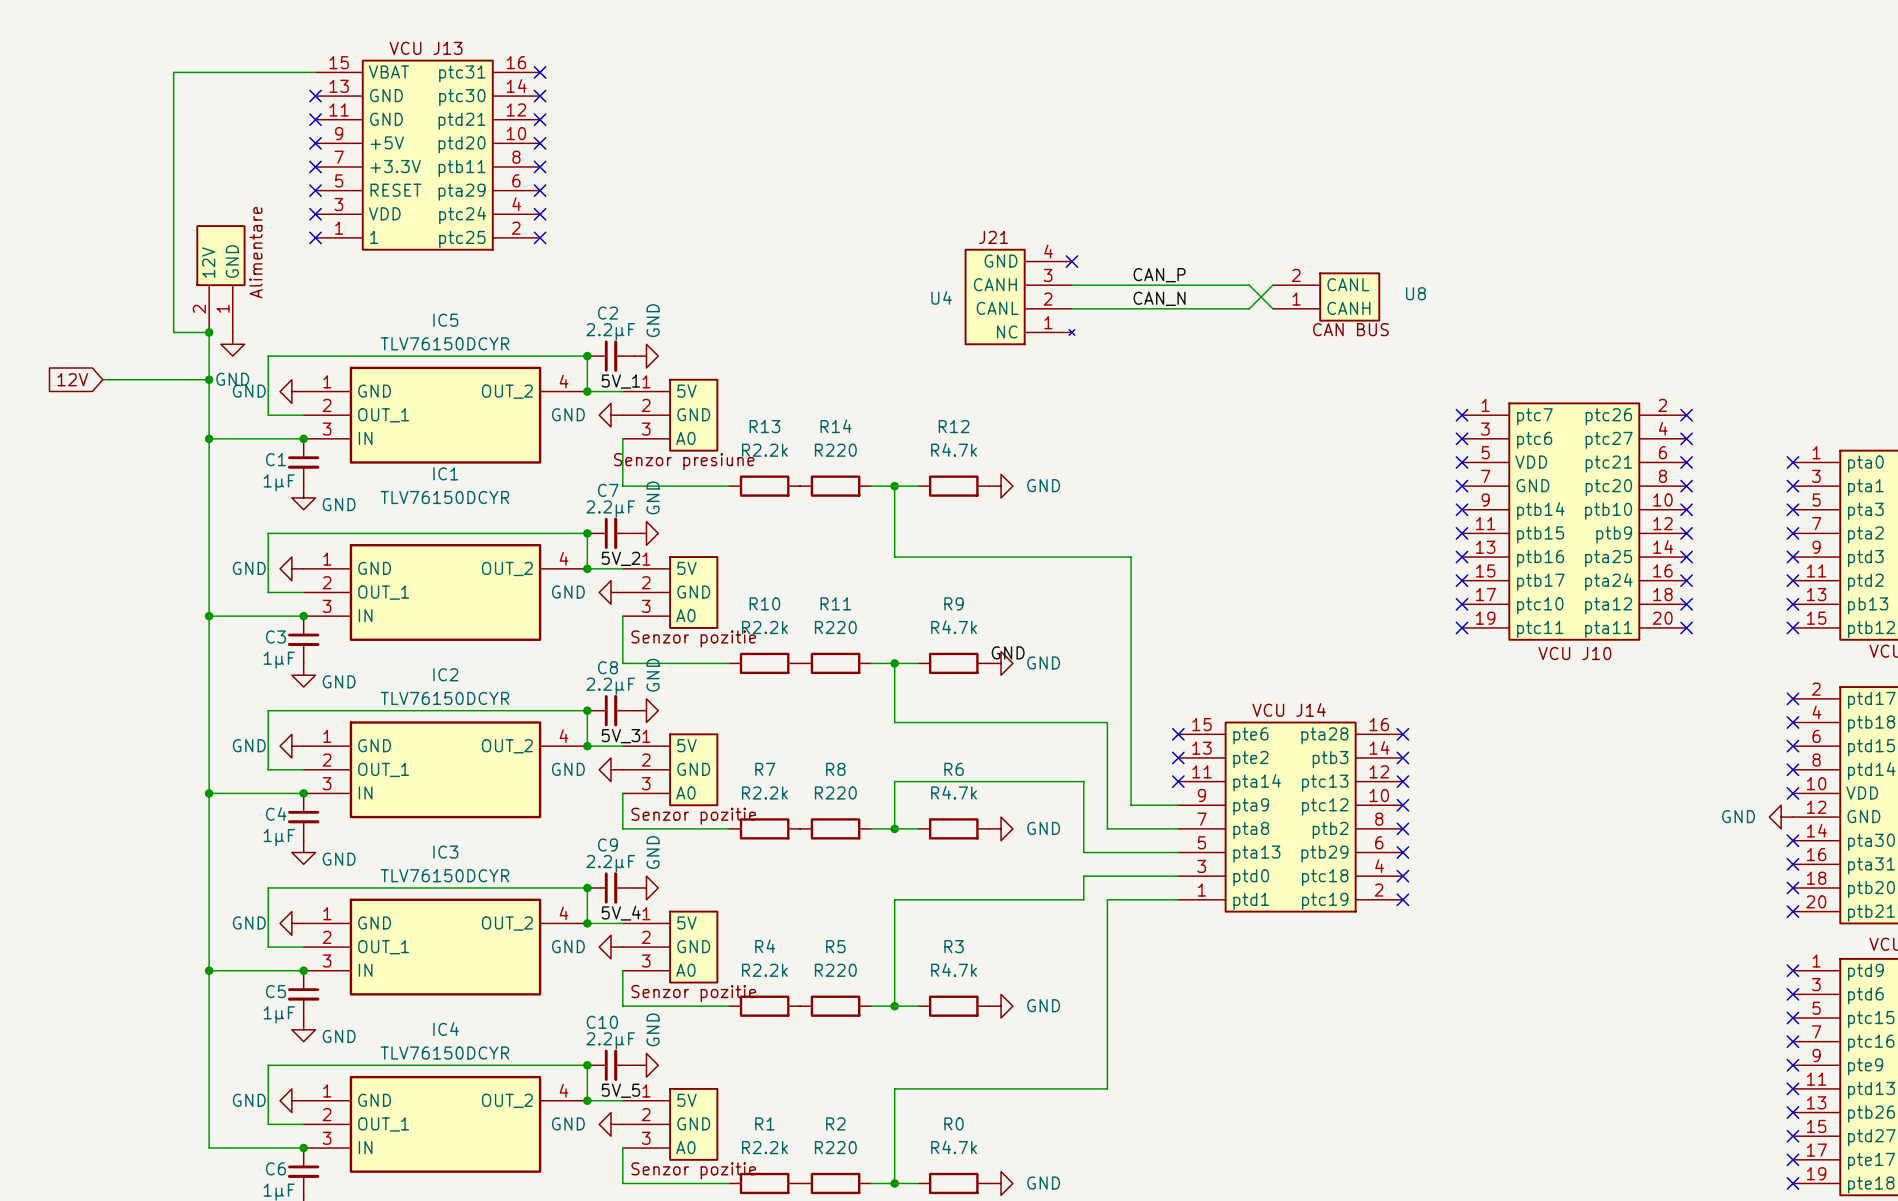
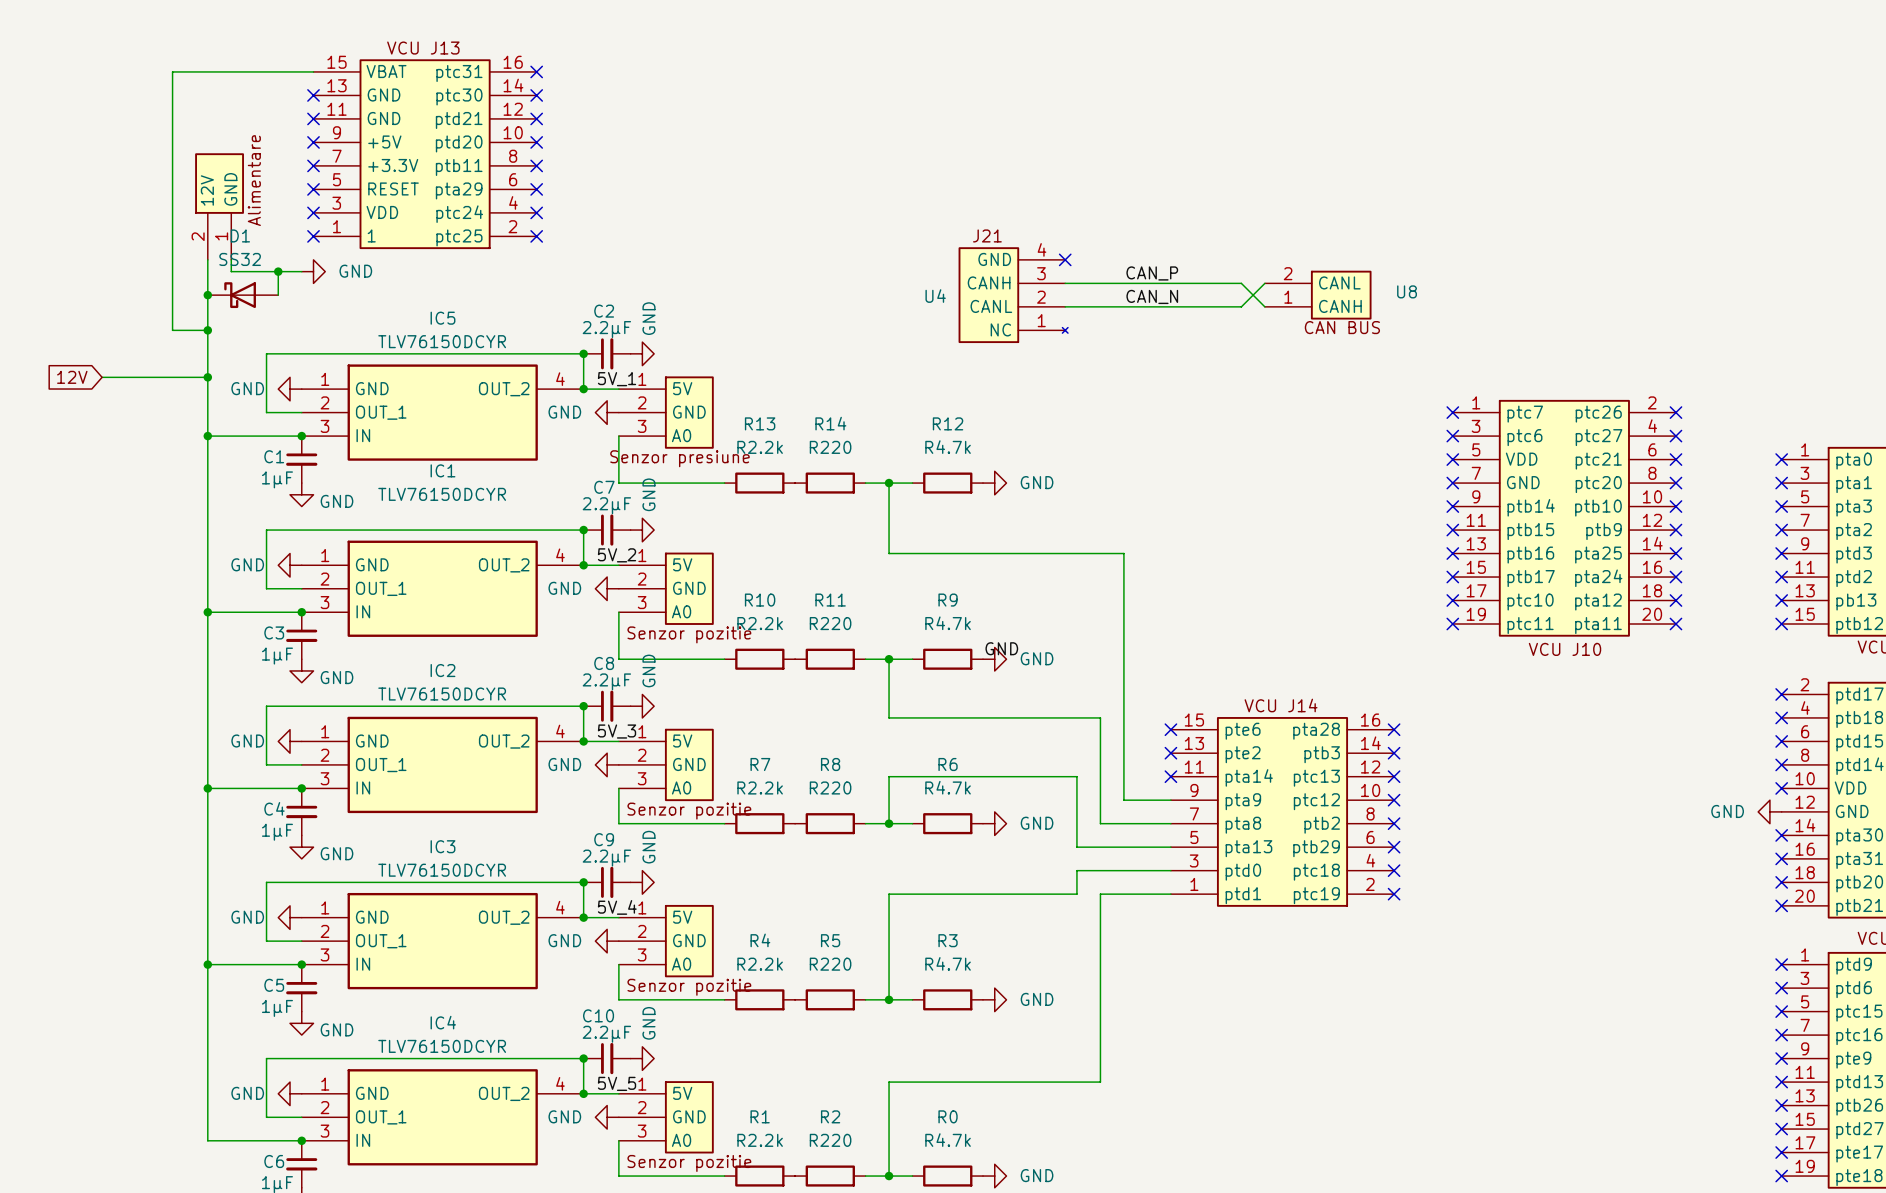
wire: none -> (231, 259) (231, 271) (301, 271)
wire: none -> (278, 271) (278, 295)
junction: none -> (278, 271)
part position: (220, 278) -> (219, 206)
junction: none -> (207, 295)
D1: none -> SS32 (243, 295)
power symbol rotation: 0° (232, 344) -> 90° counterclockwise (313, 271)
power symbol position: GND (232, 344) -> GND (313, 271)

